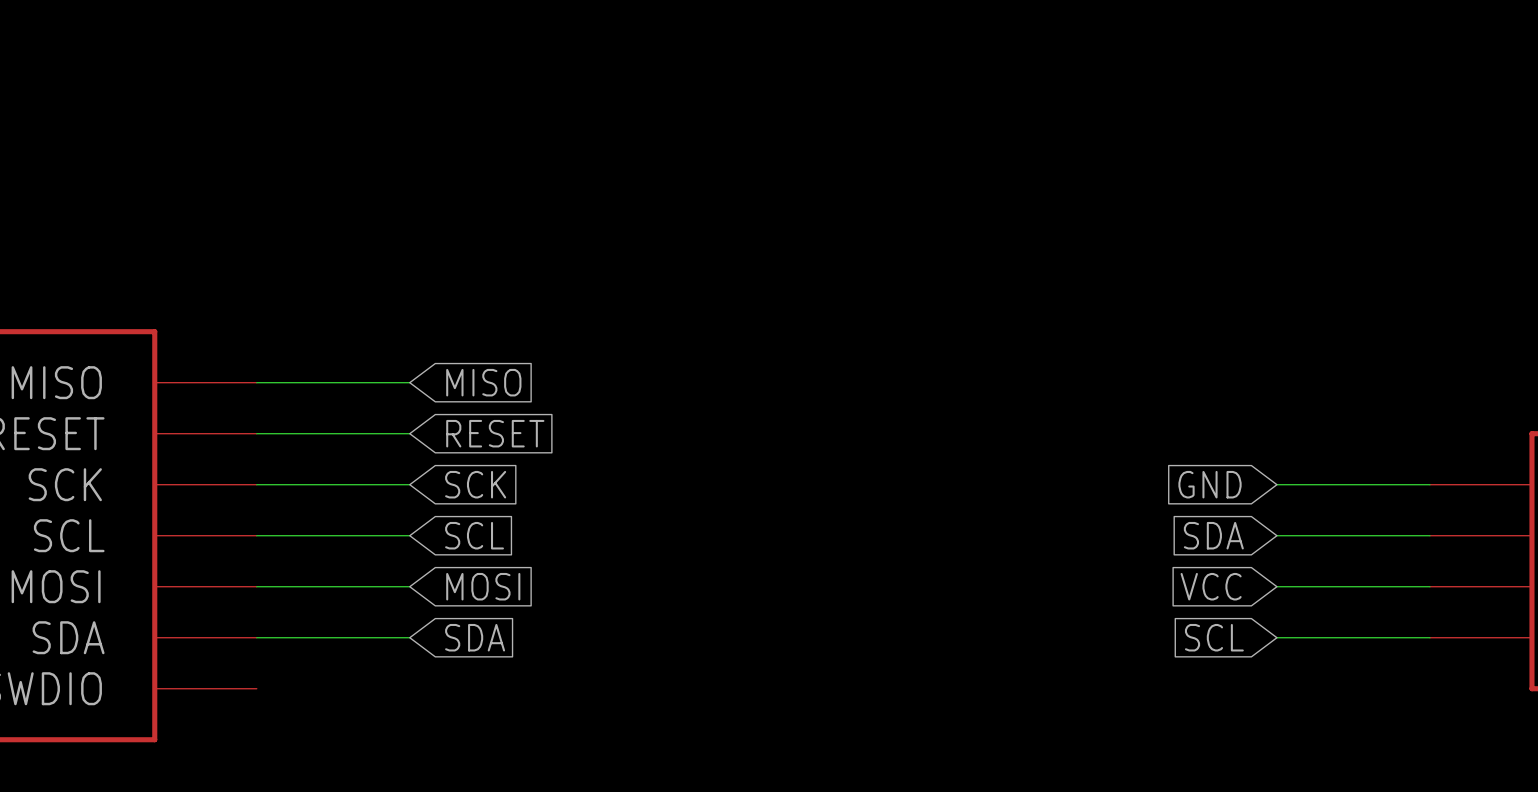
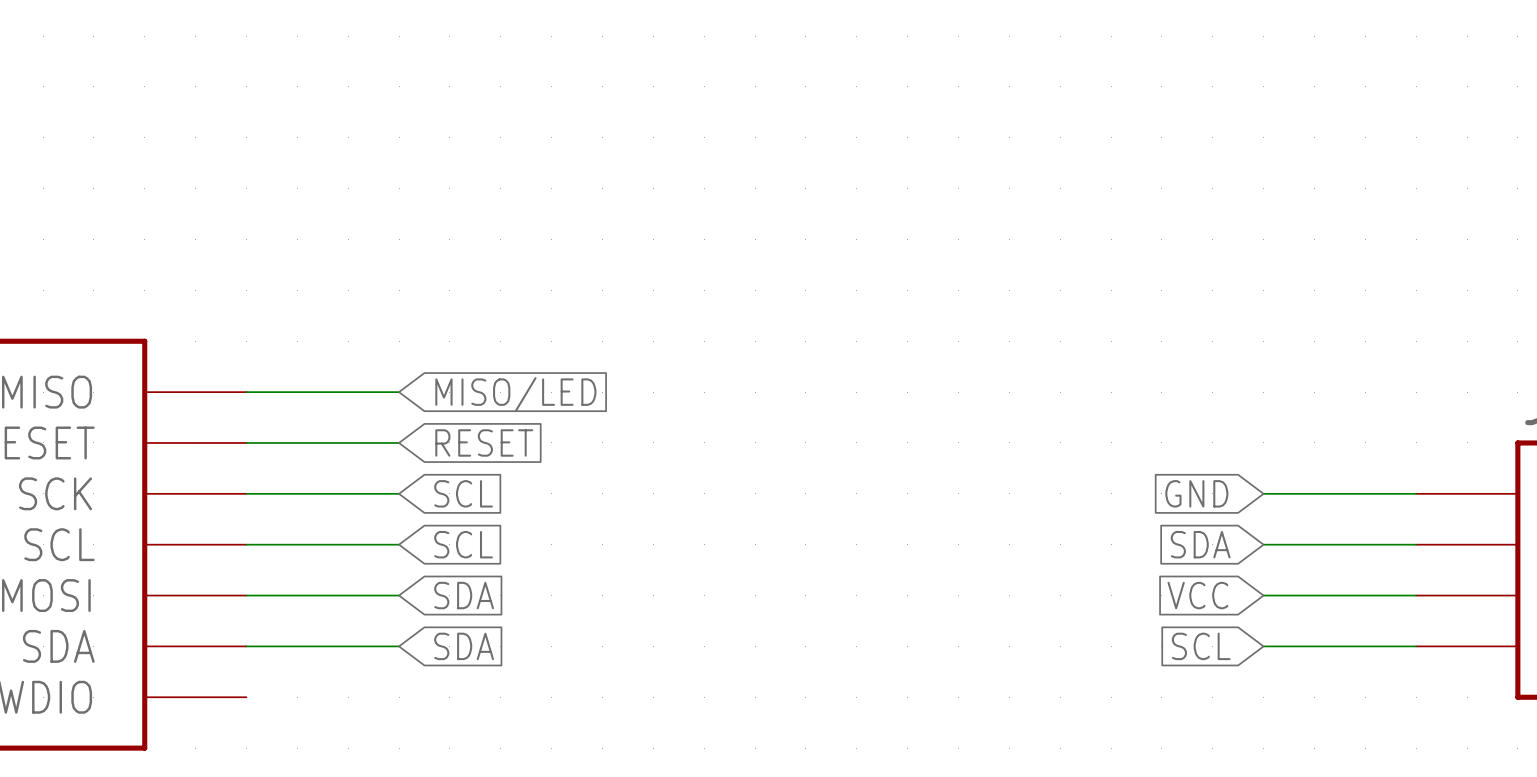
global label: MISO (483, 382) -> MISO/LED (515, 394)
global label: SCK (475, 484) -> SCL (463, 493)
global label: MOSI (483, 586) -> SDA (464, 595)

